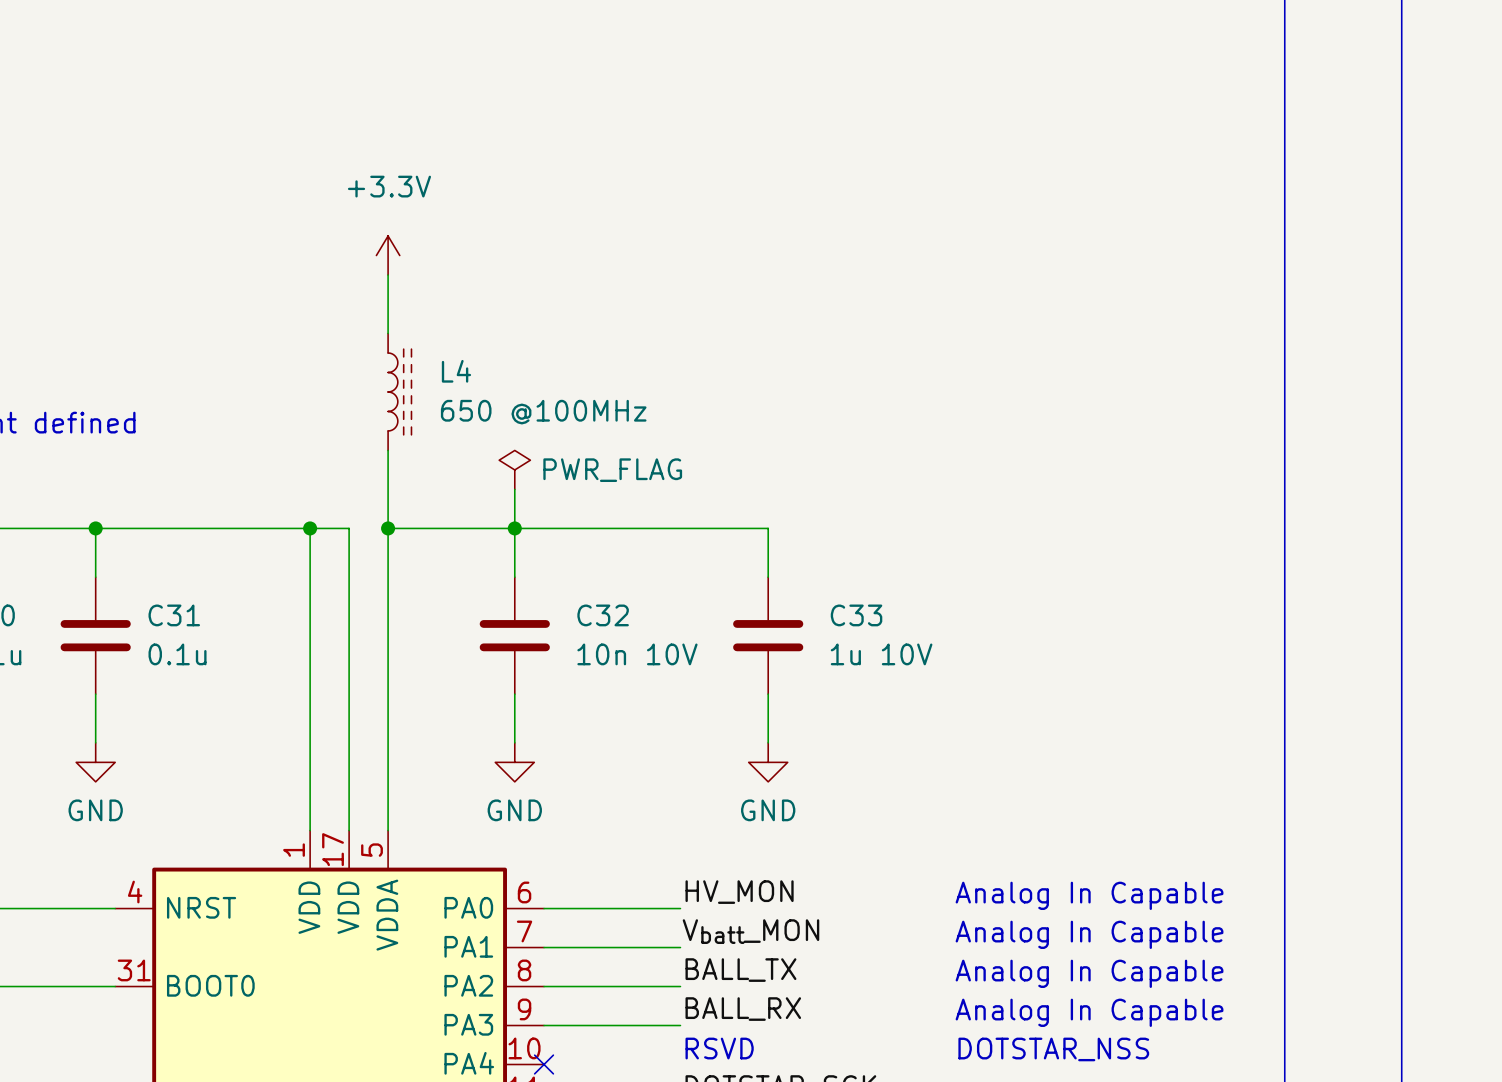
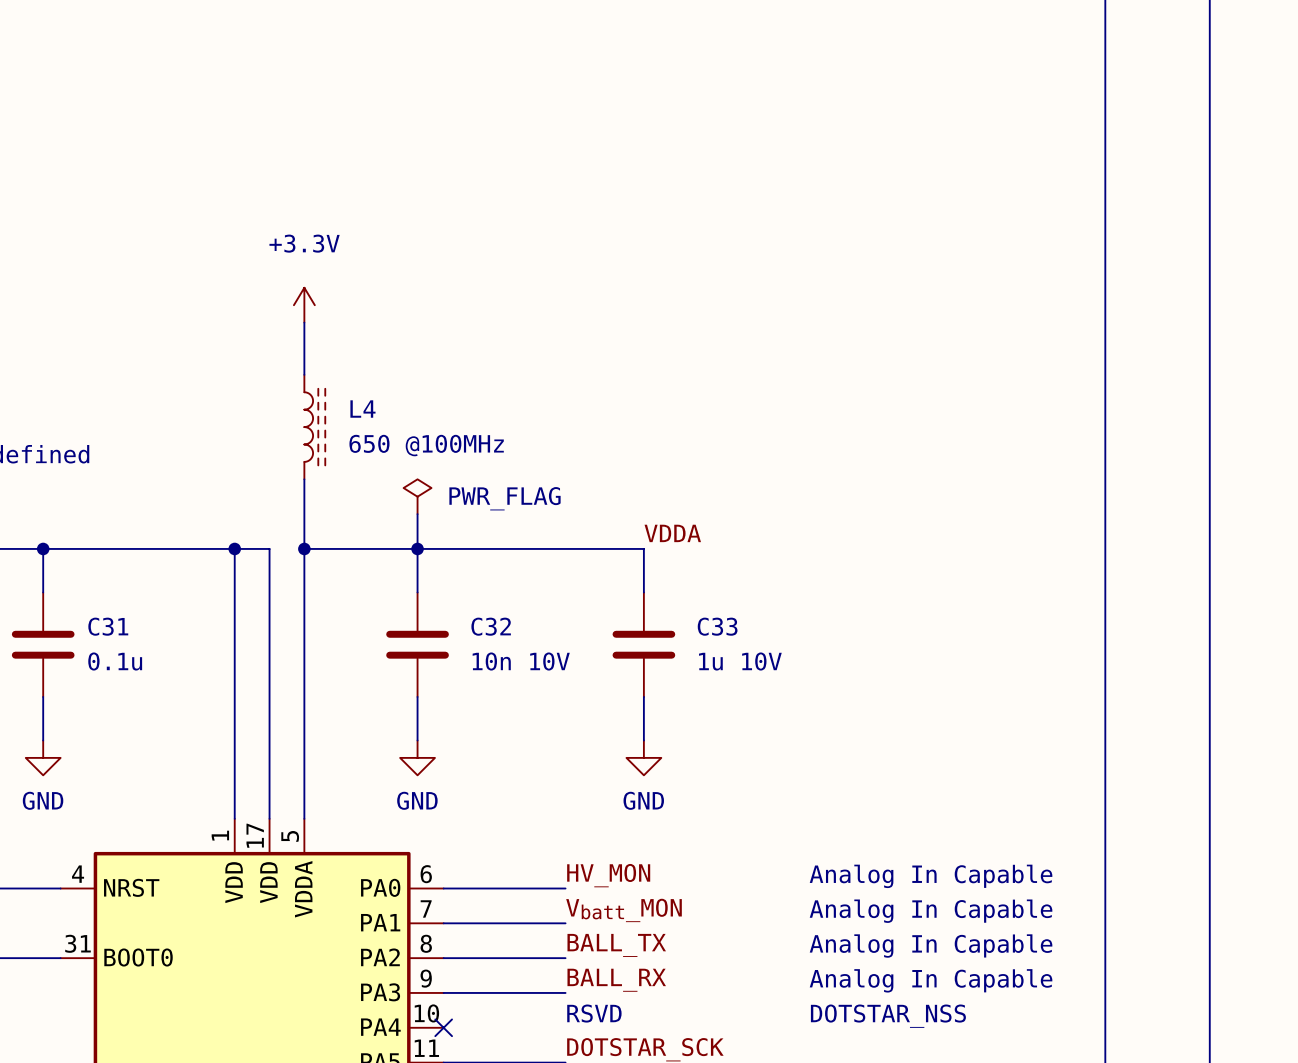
label: none -> VDDA (672, 533)

